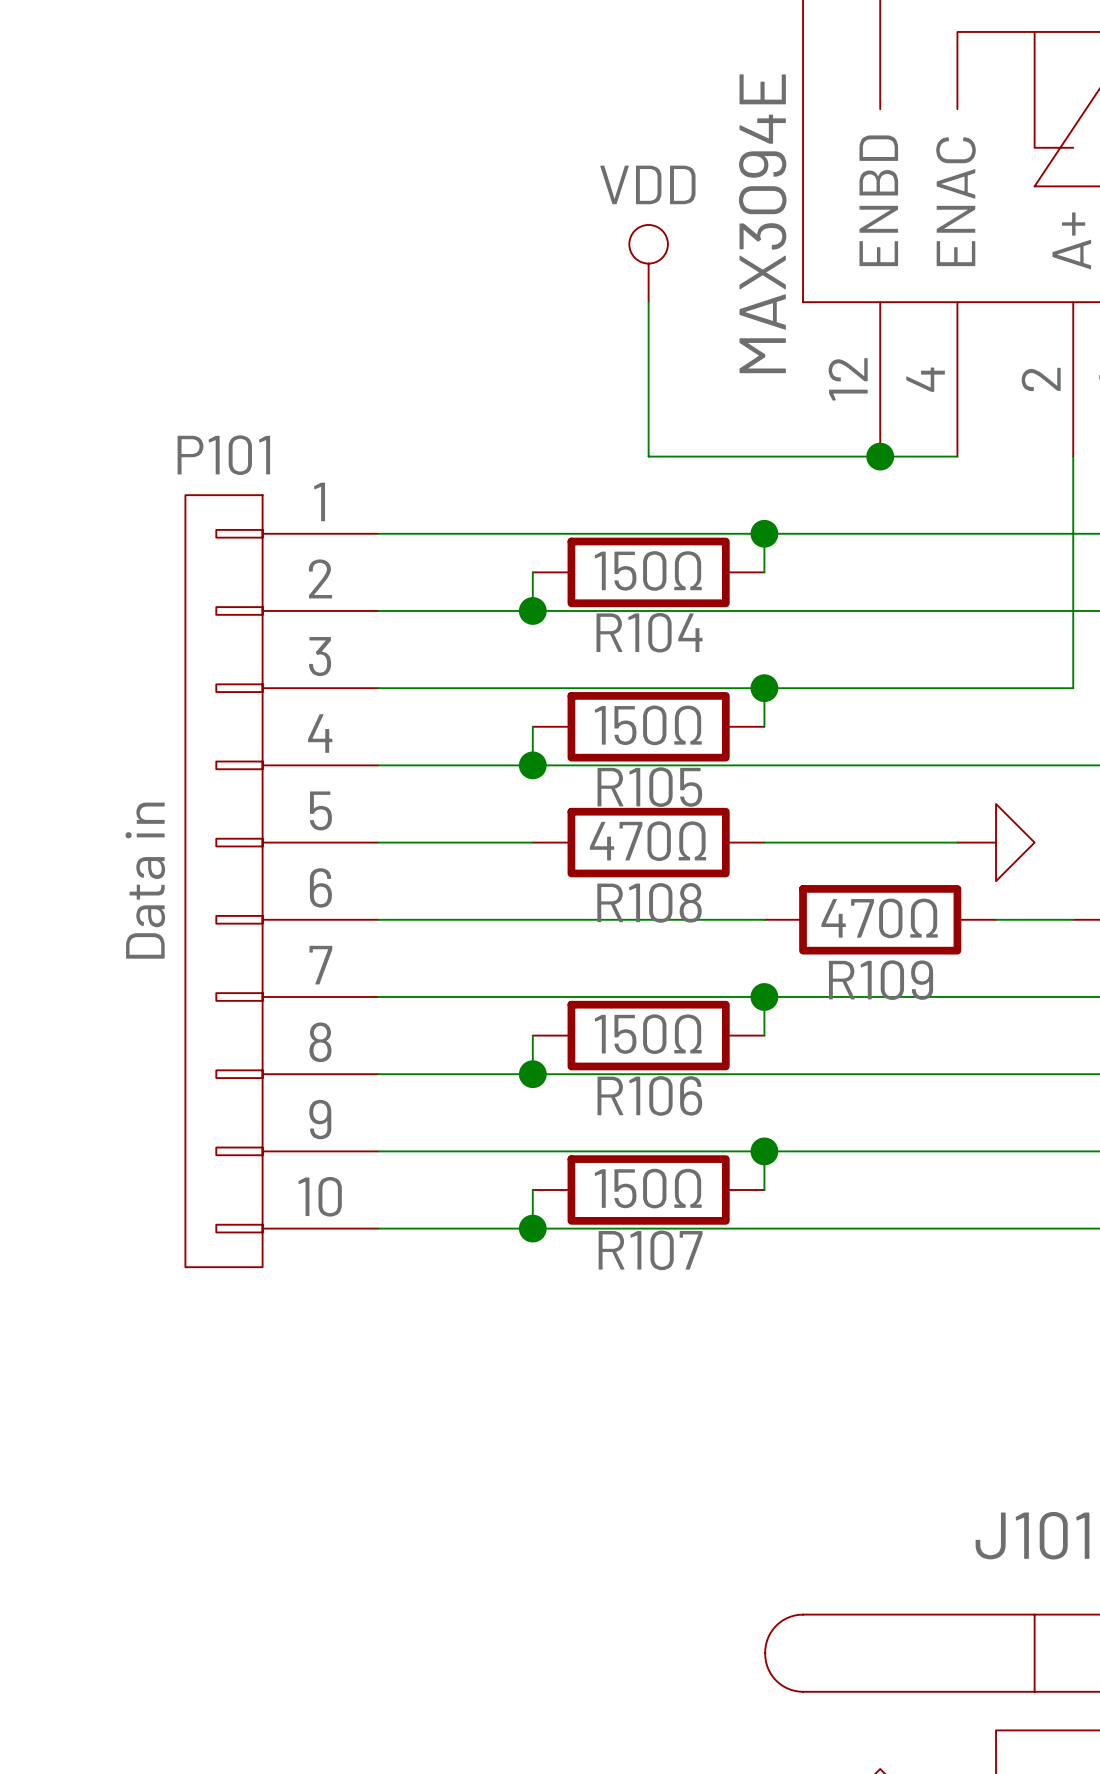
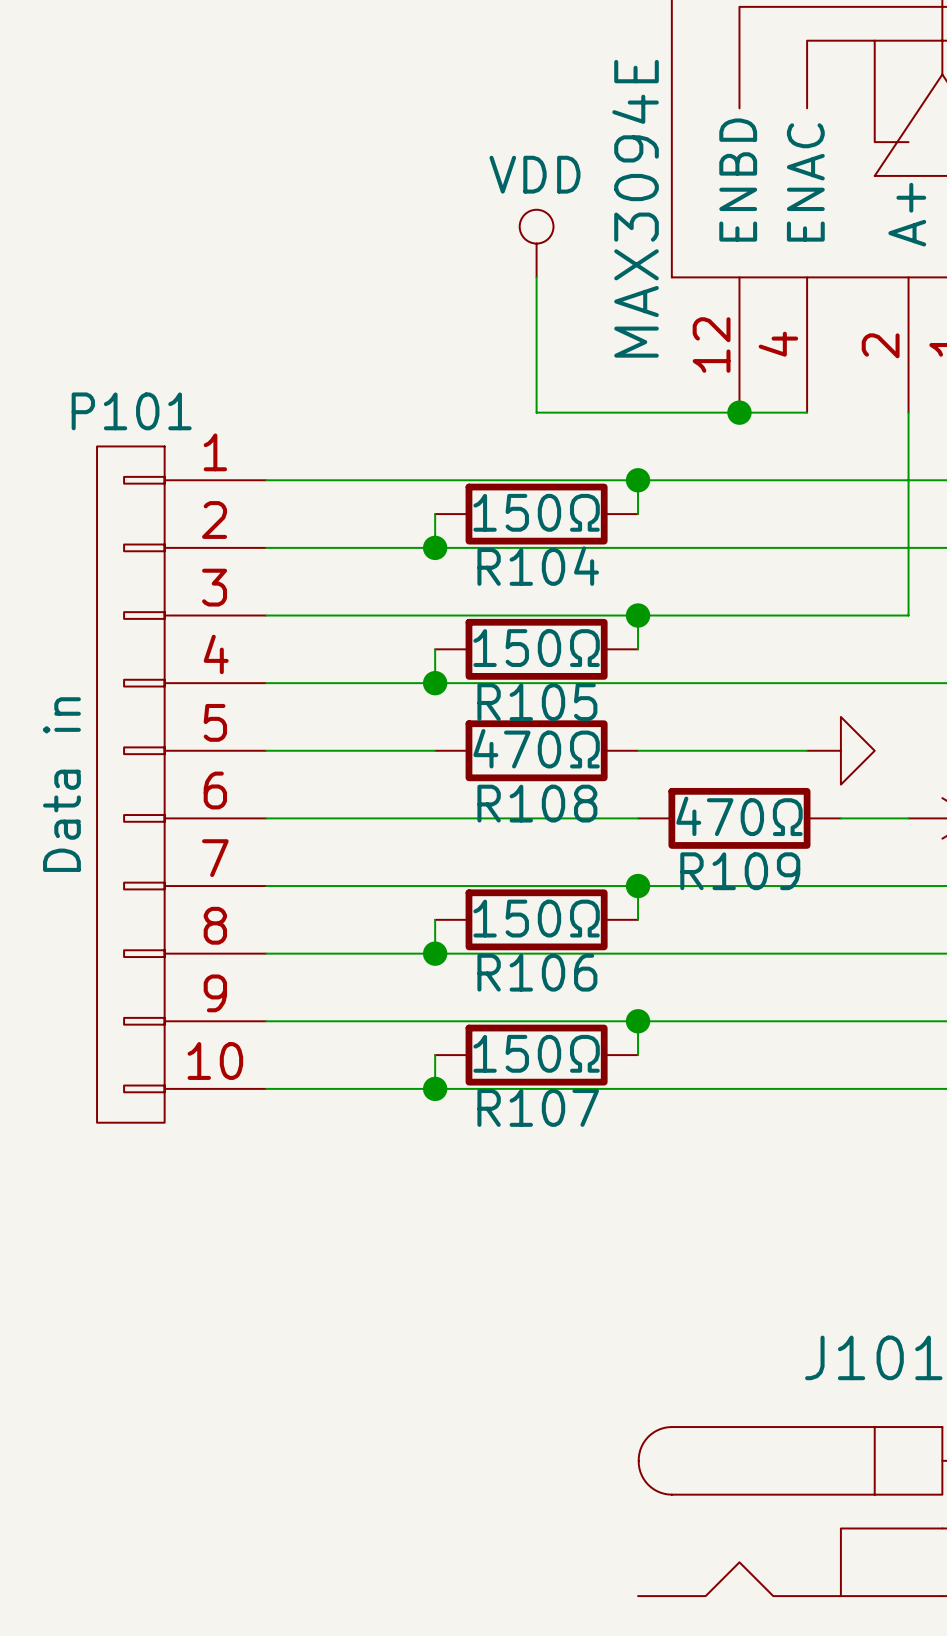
P101 position: (281, 881) -> (181, 784)

